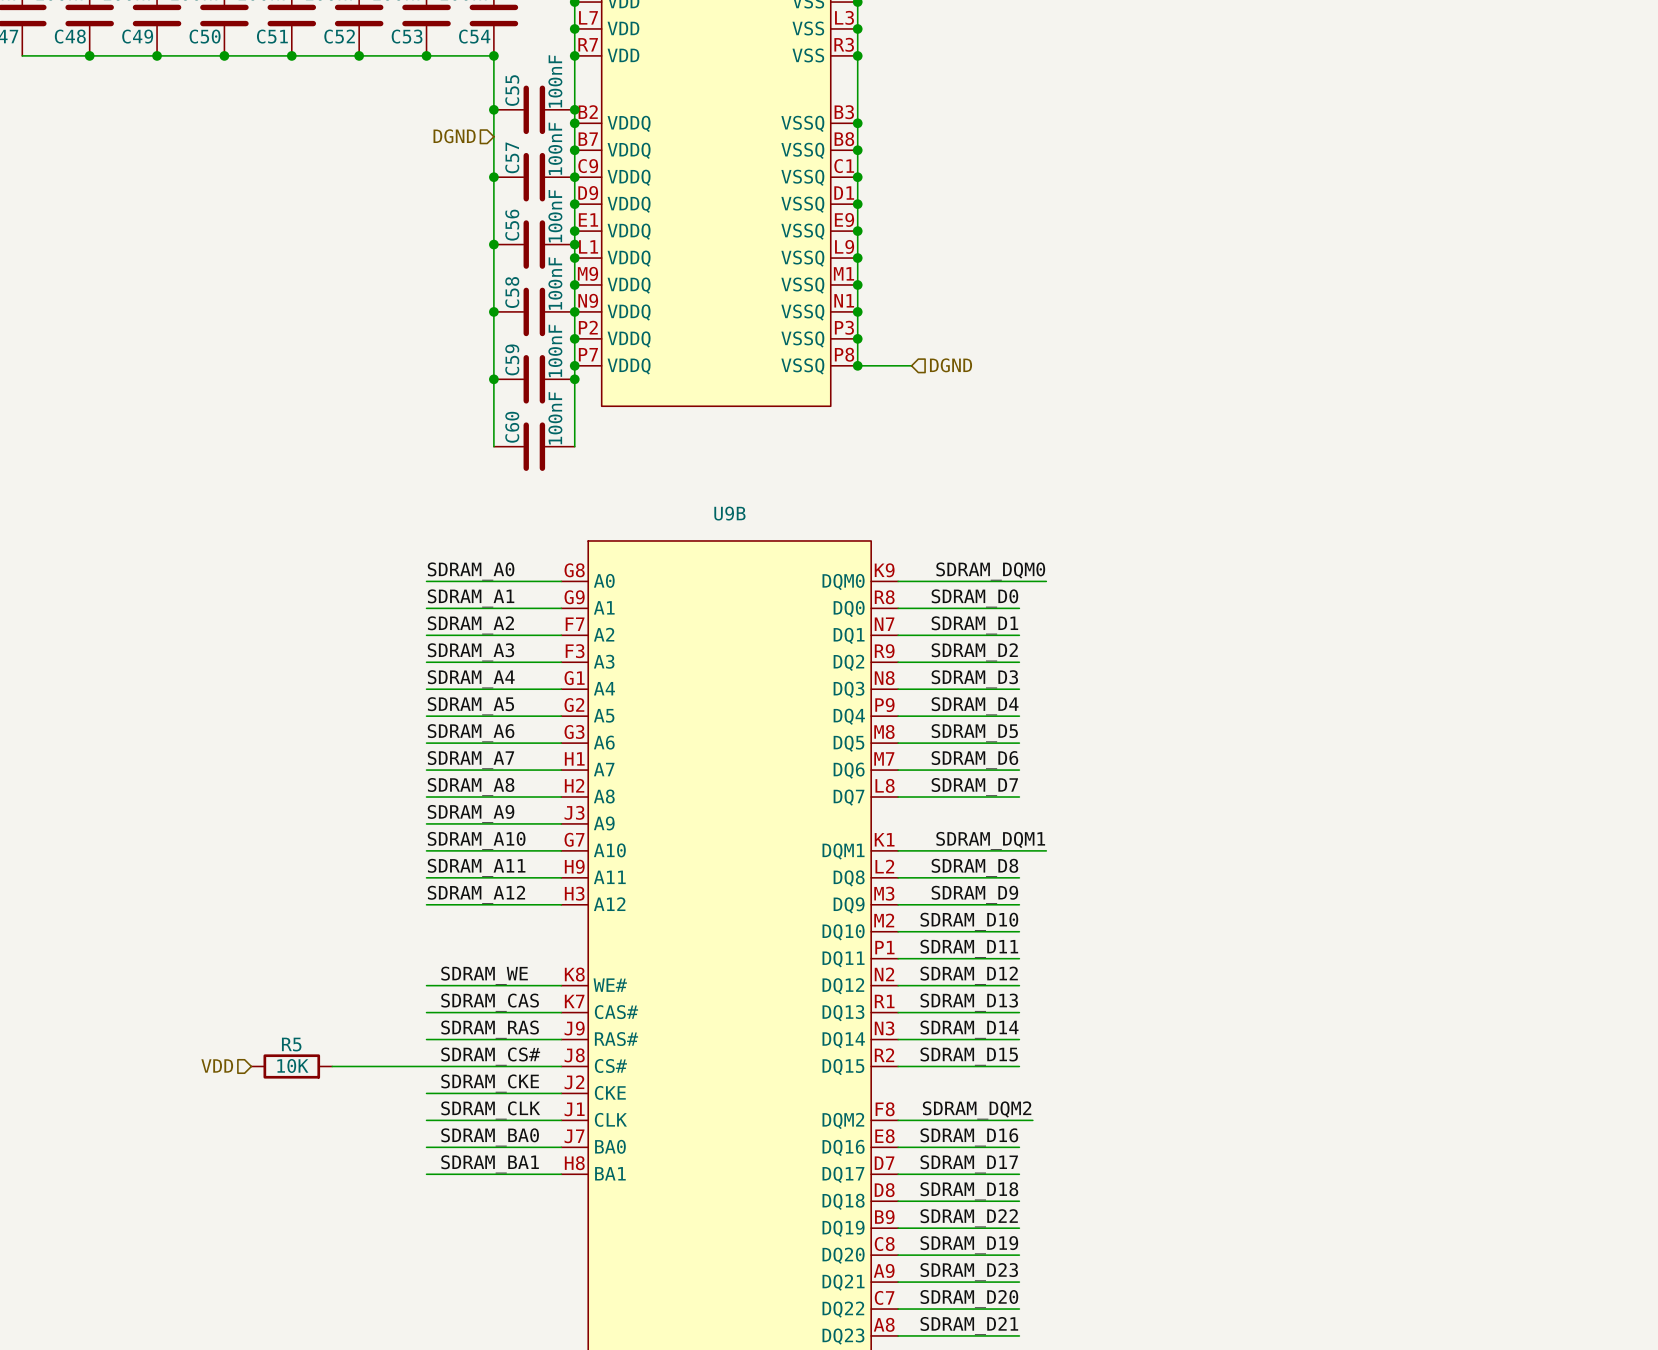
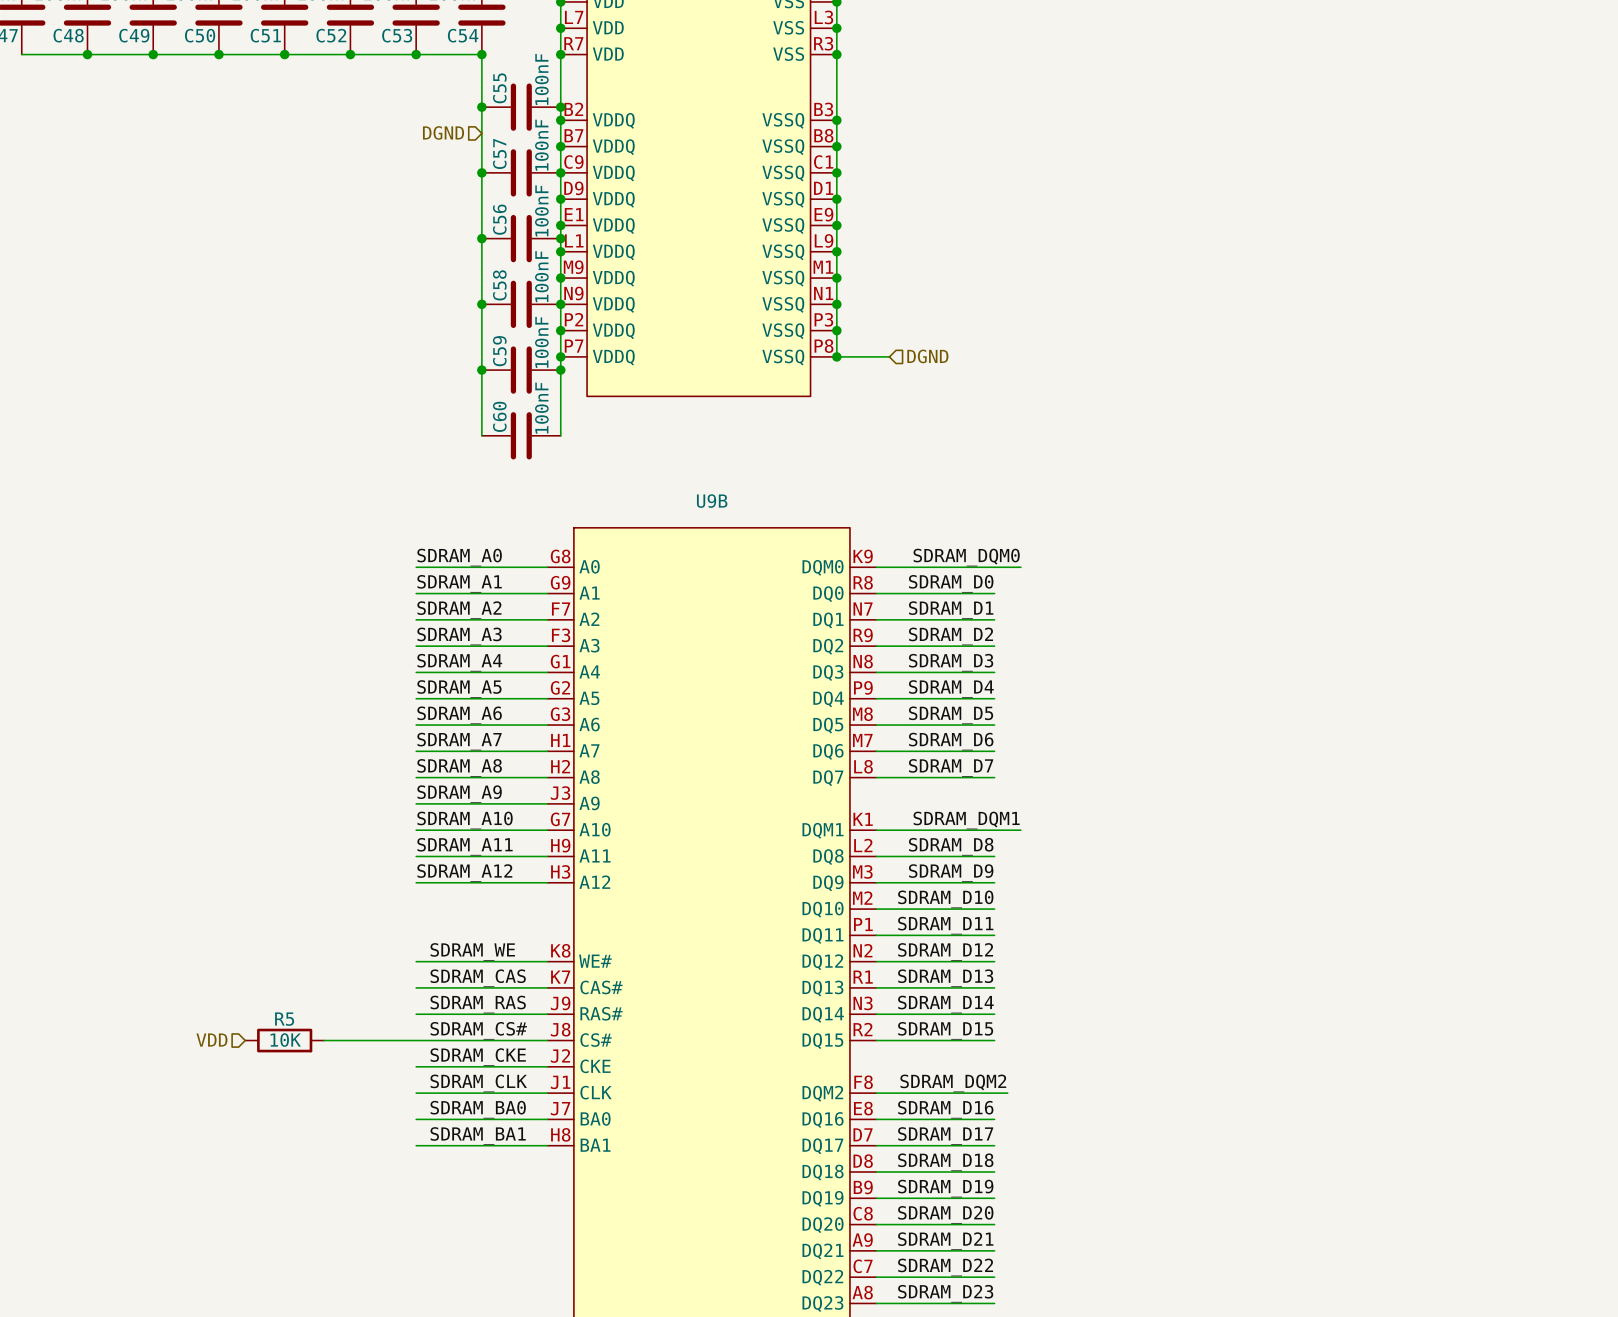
label: SDRAM_D22 (969, 1218) -> SDRAM_D19 (945, 1188)
label: SDRAM_D19 (969, 1245) -> SDRAM_D20 (945, 1214)
label: SDRAM_D23 (969, 1272) -> SDRAM_D21 (945, 1241)
label: SDRAM_D20 (969, 1299) -> SDRAM_D22 (945, 1267)
label: SDRAM_D21 (969, 1326) -> SDRAM_D23 (945, 1293)

